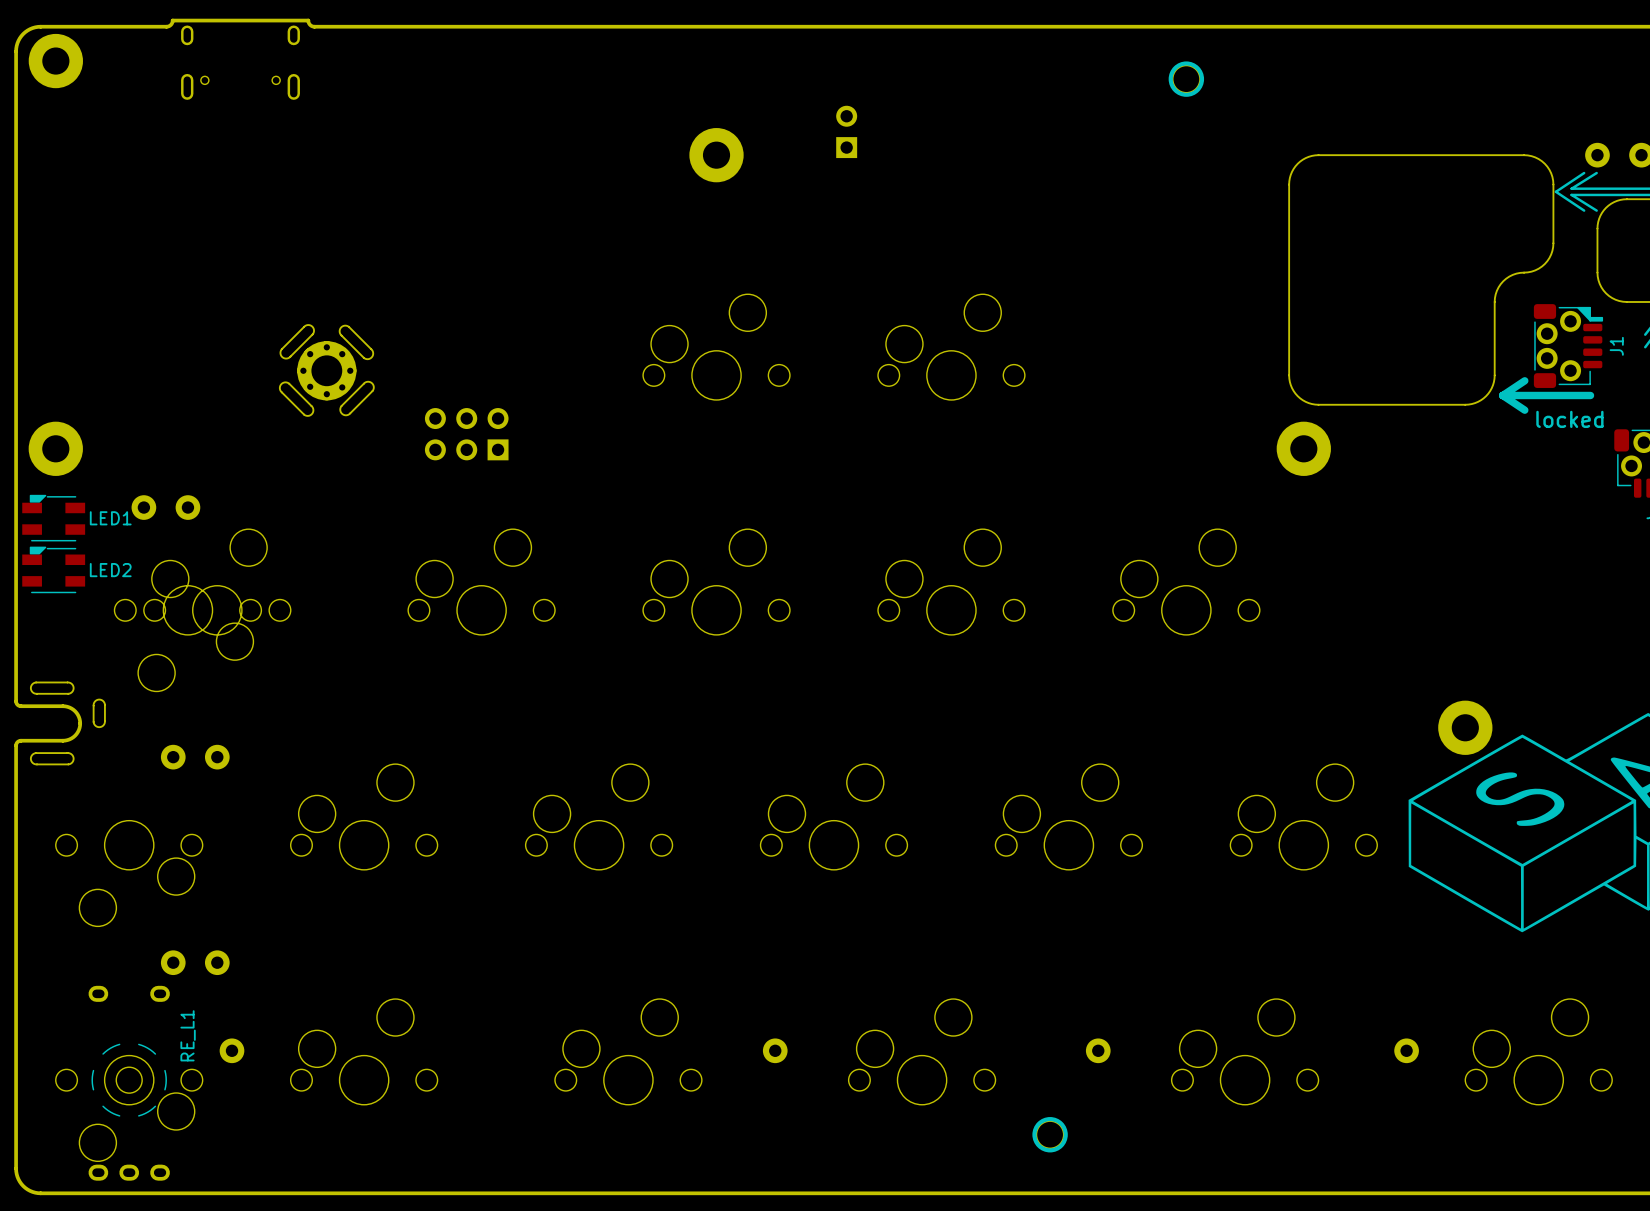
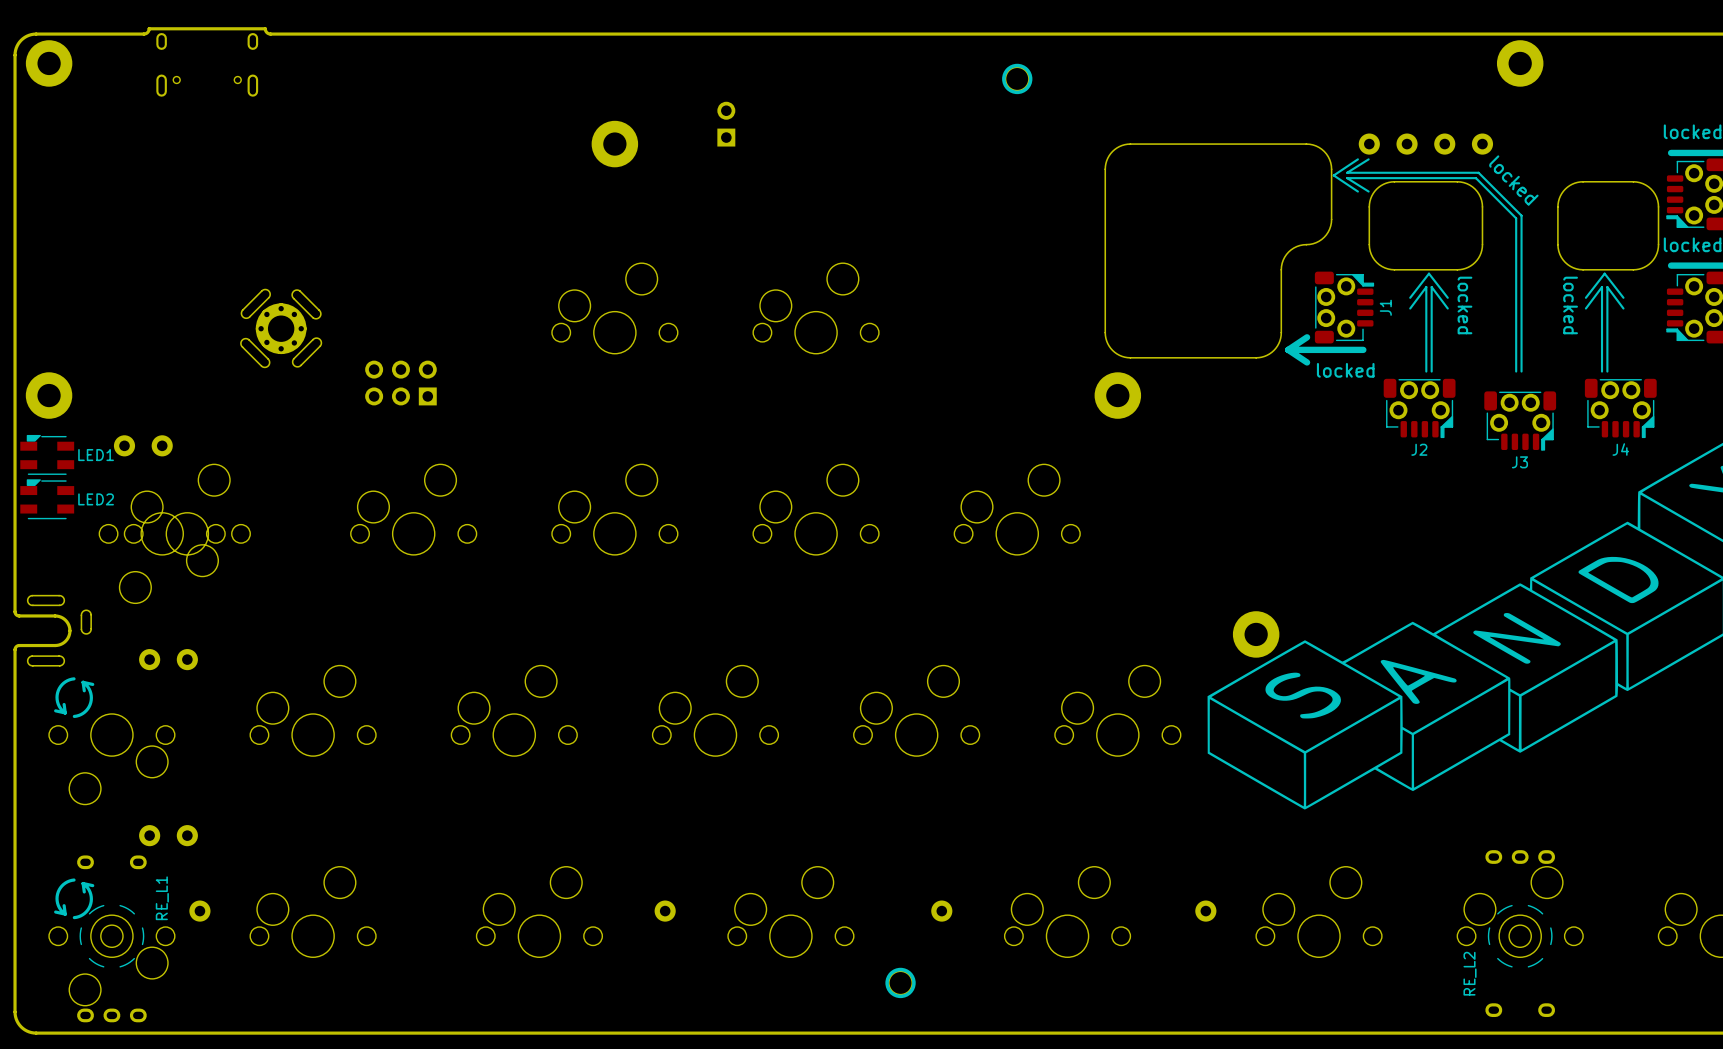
drawing: none -> [54, 677, 95, 719]
drawing: none -> [54, 878, 95, 920]

